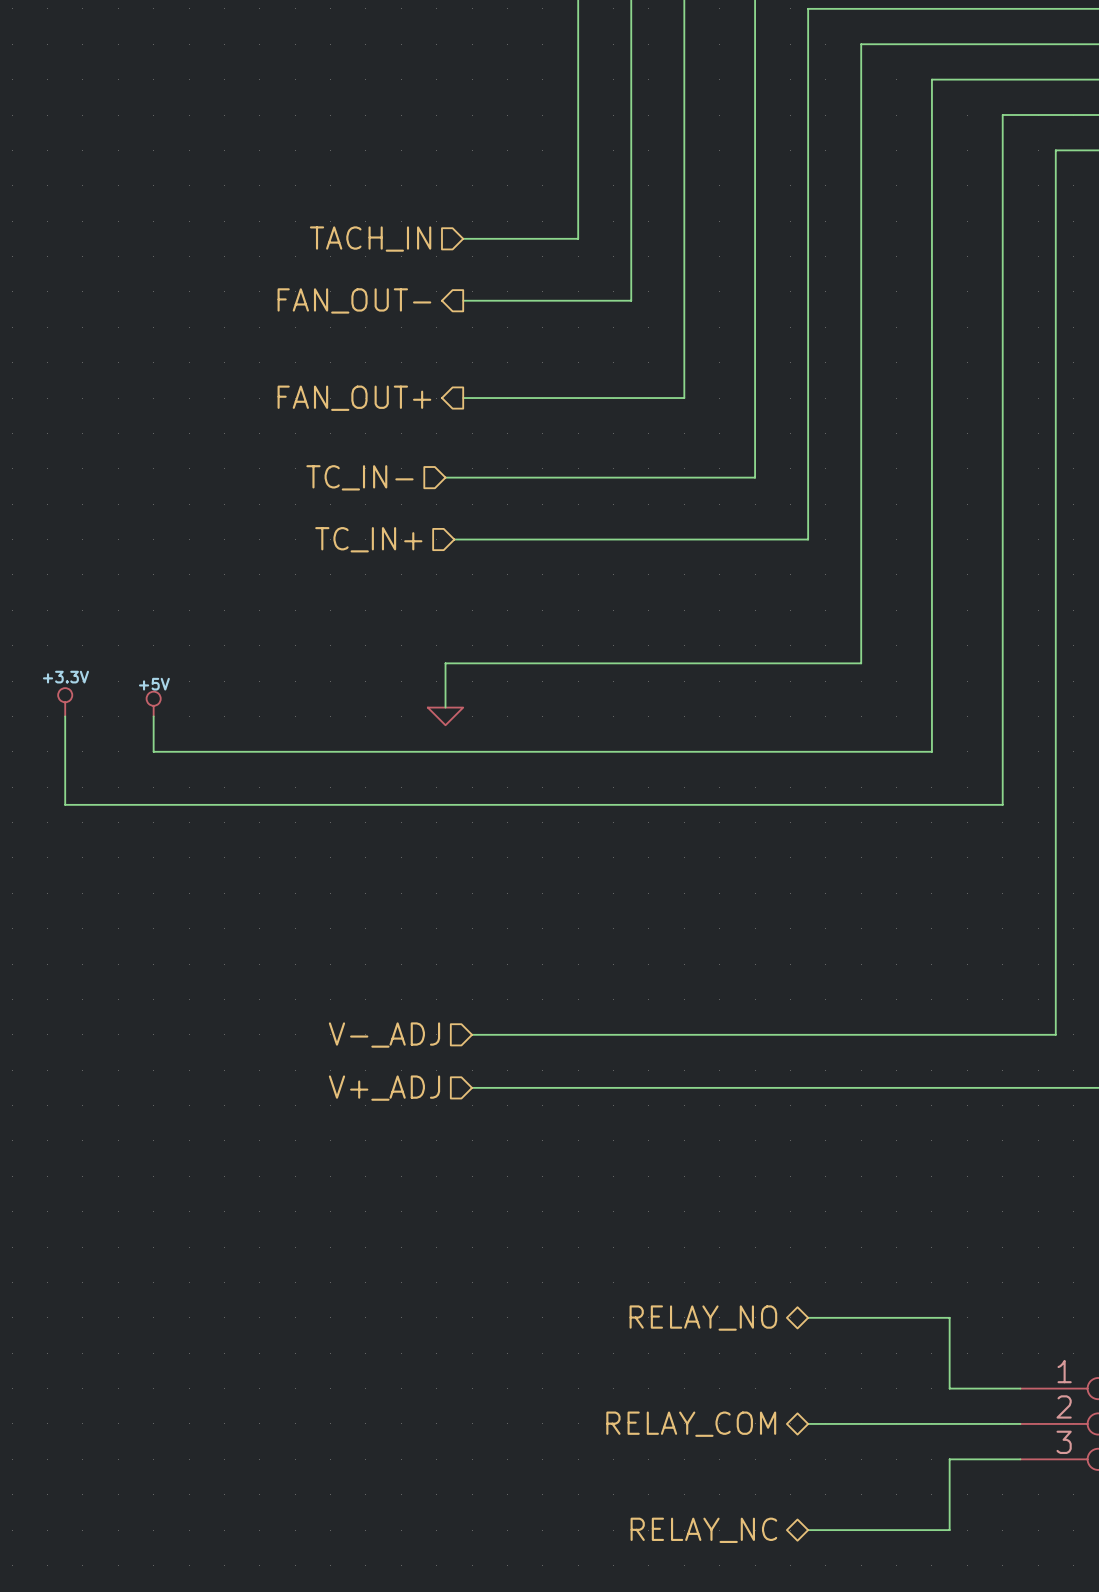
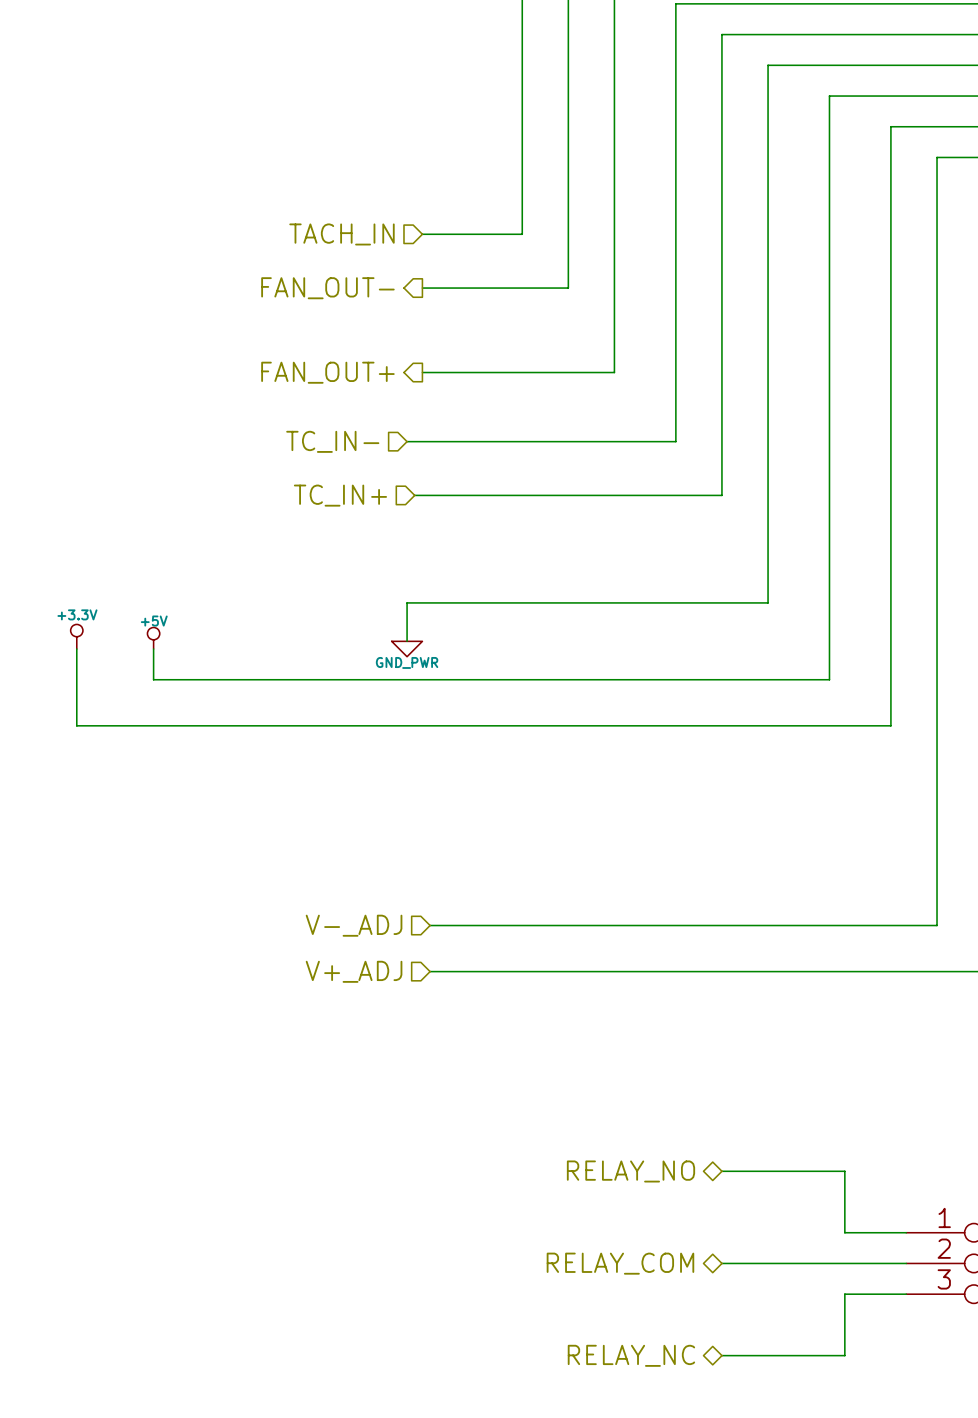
power symbol text: none -> GND_PWR (407, 662)

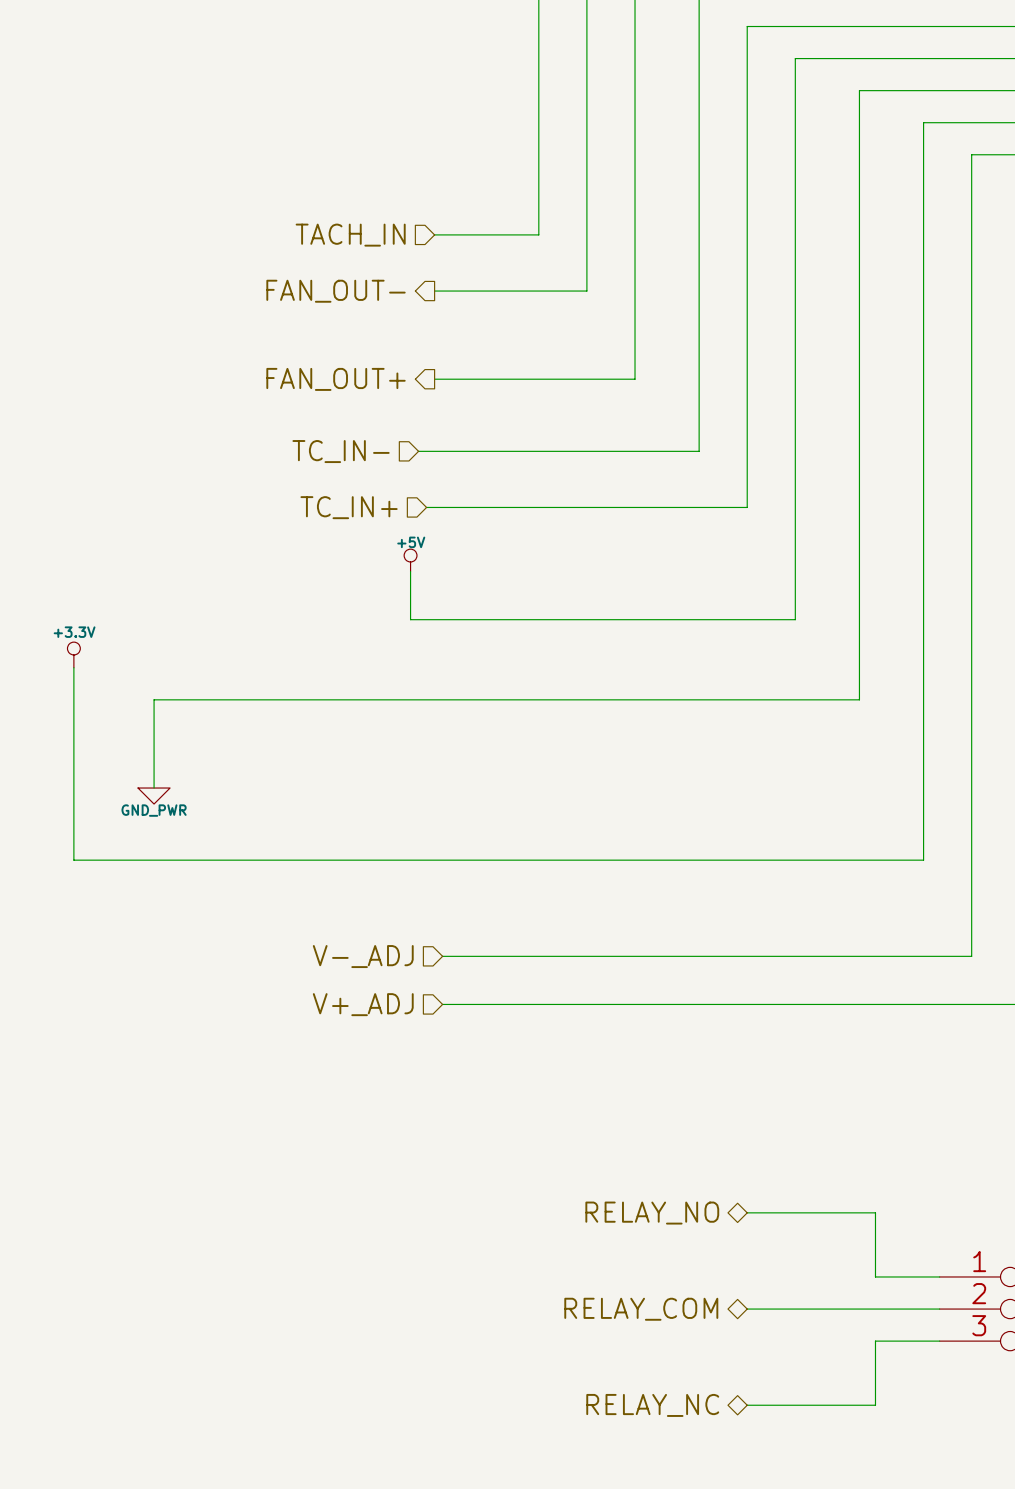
wire: (407, 602) (407, 641) -> (418, 619) (410, 619) (410, 571)
power symbol position: +5V (153, 638) -> +5V (410, 560)
wire: (153, 649) (153, 679) -> (154, 788) (154, 699)
power symbol position: GND_PWR (407, 649) -> GND_PWR (154, 796)
wire: (76, 725) (890, 725) -> (73, 747) (73, 860) (923, 860) (923, 747)

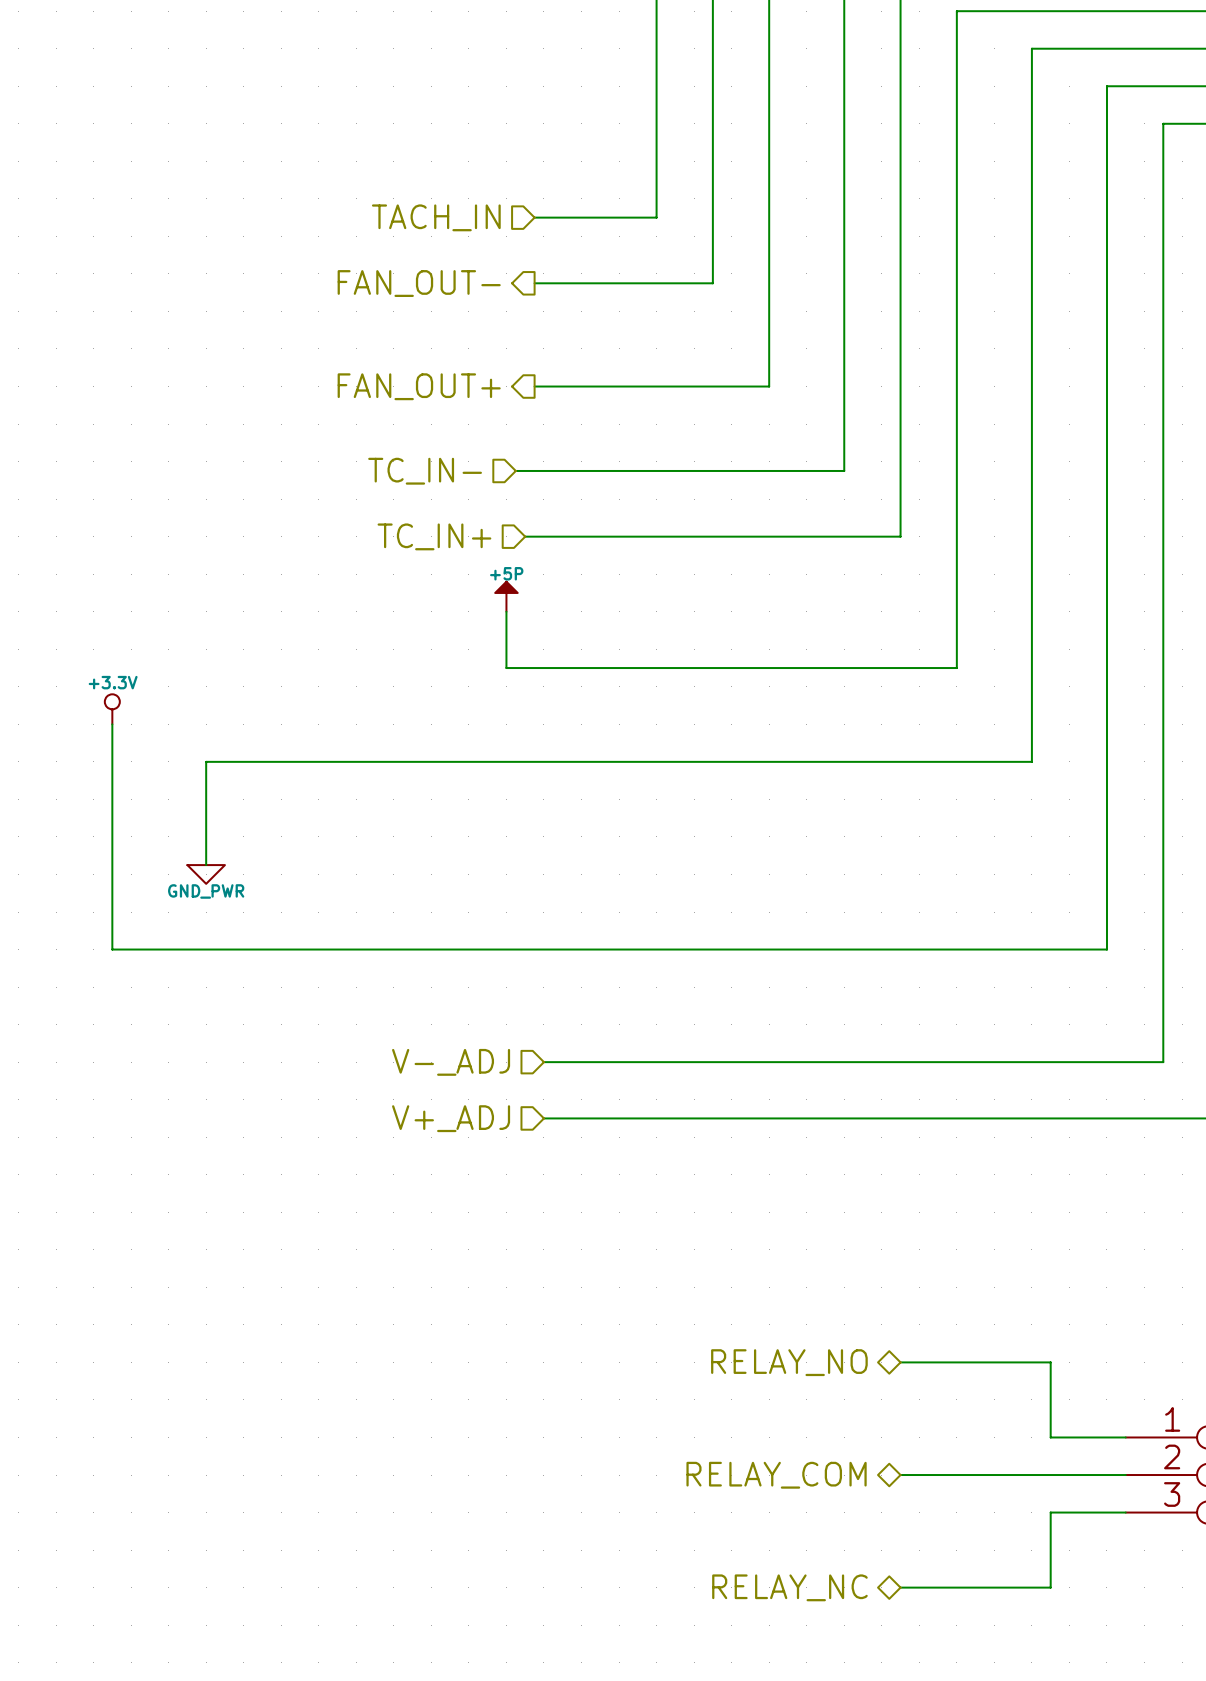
power symbol: +5V (410, 560) -> +5P (506, 596)

